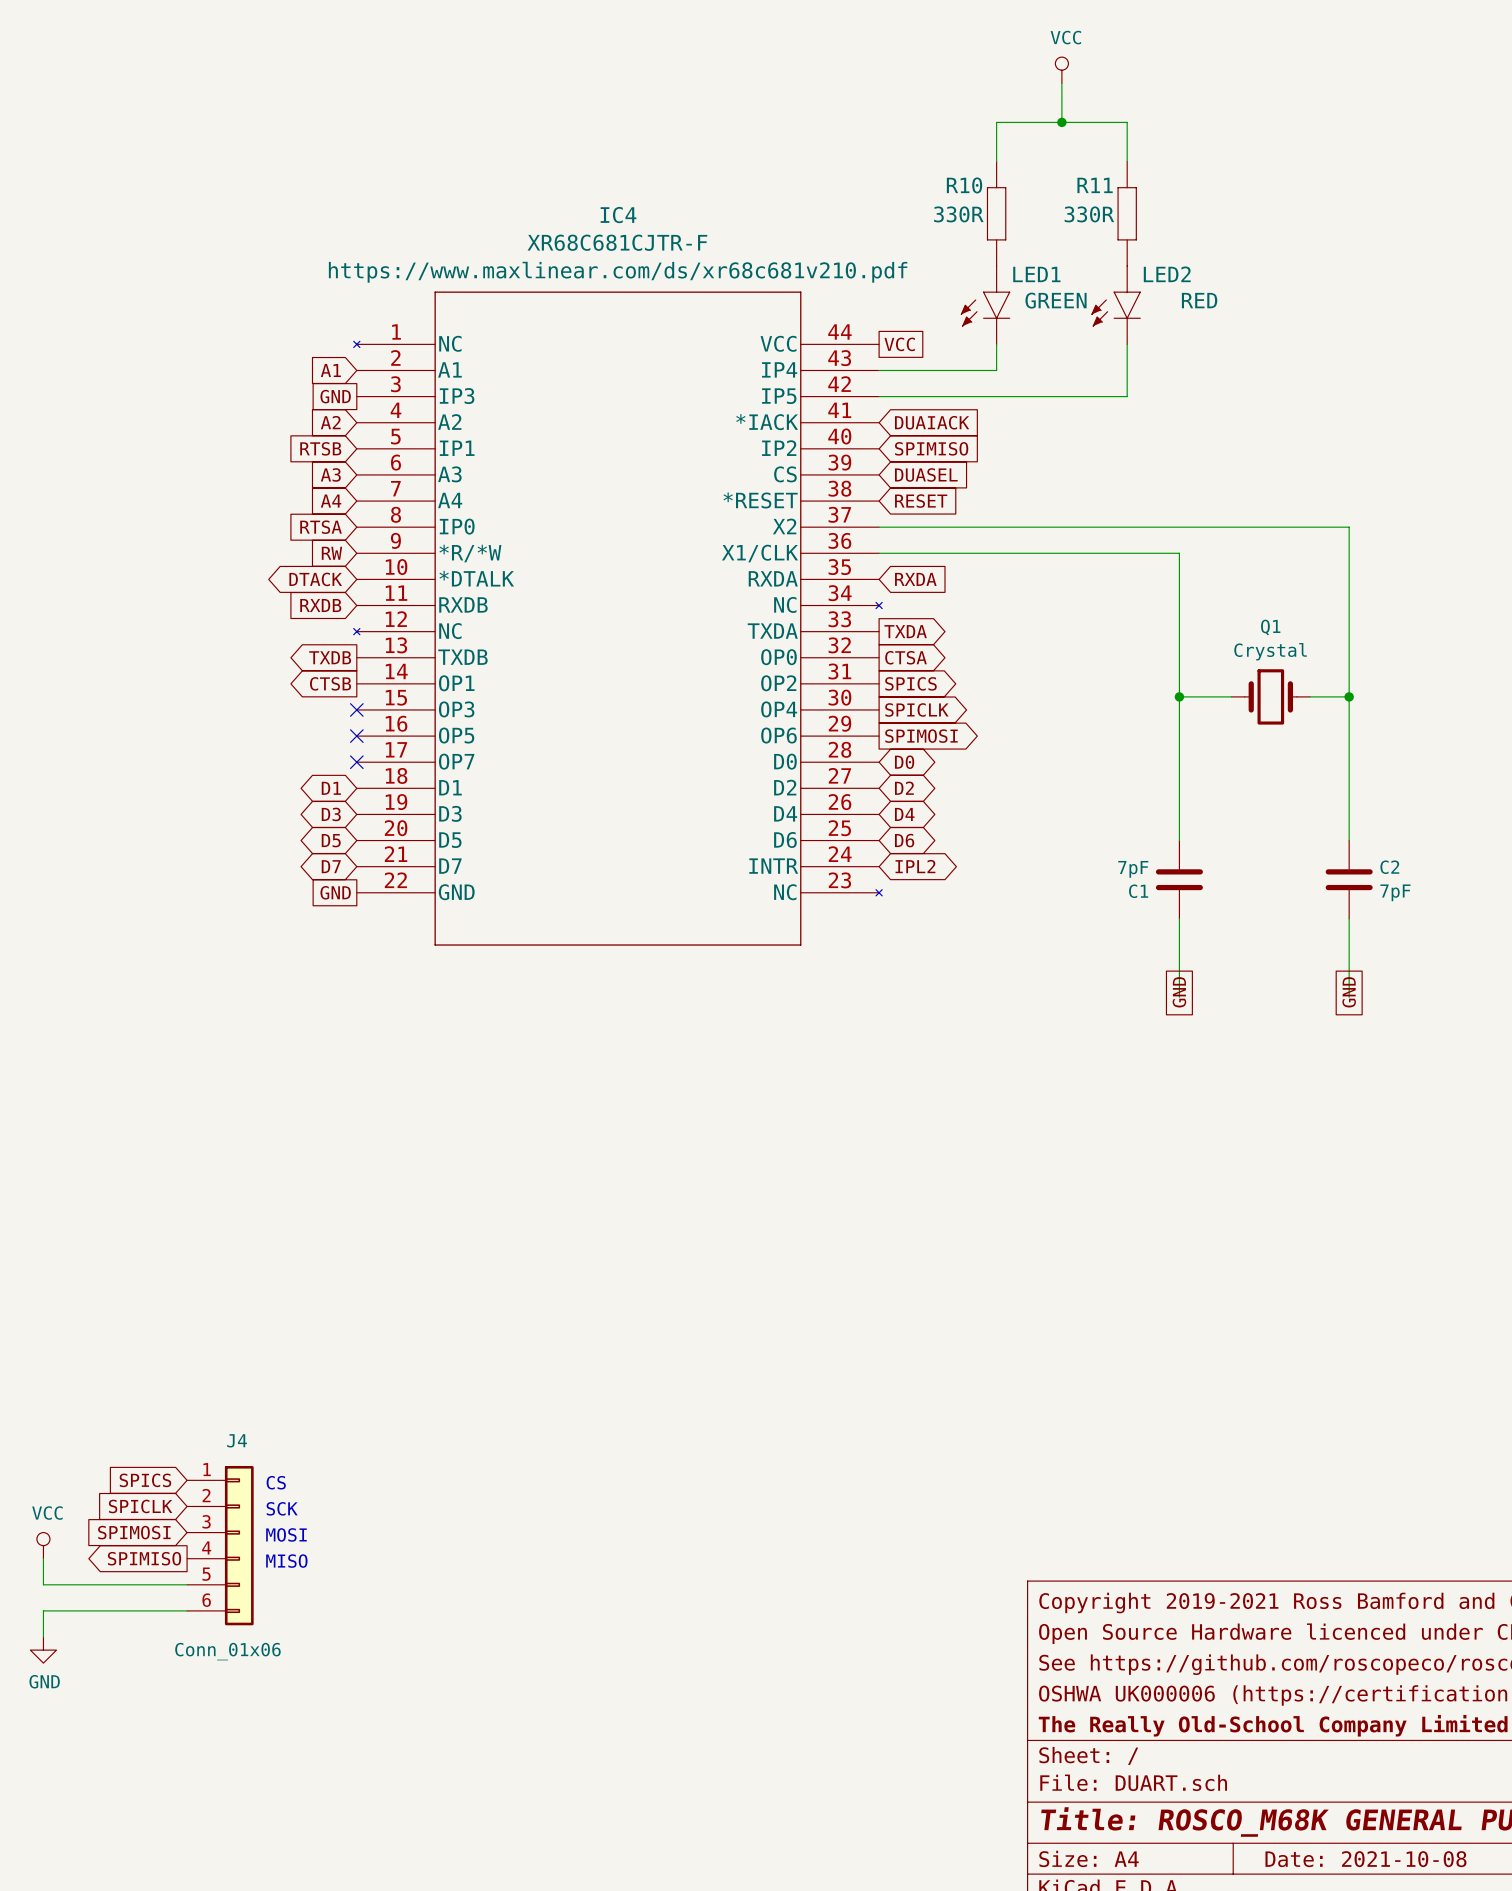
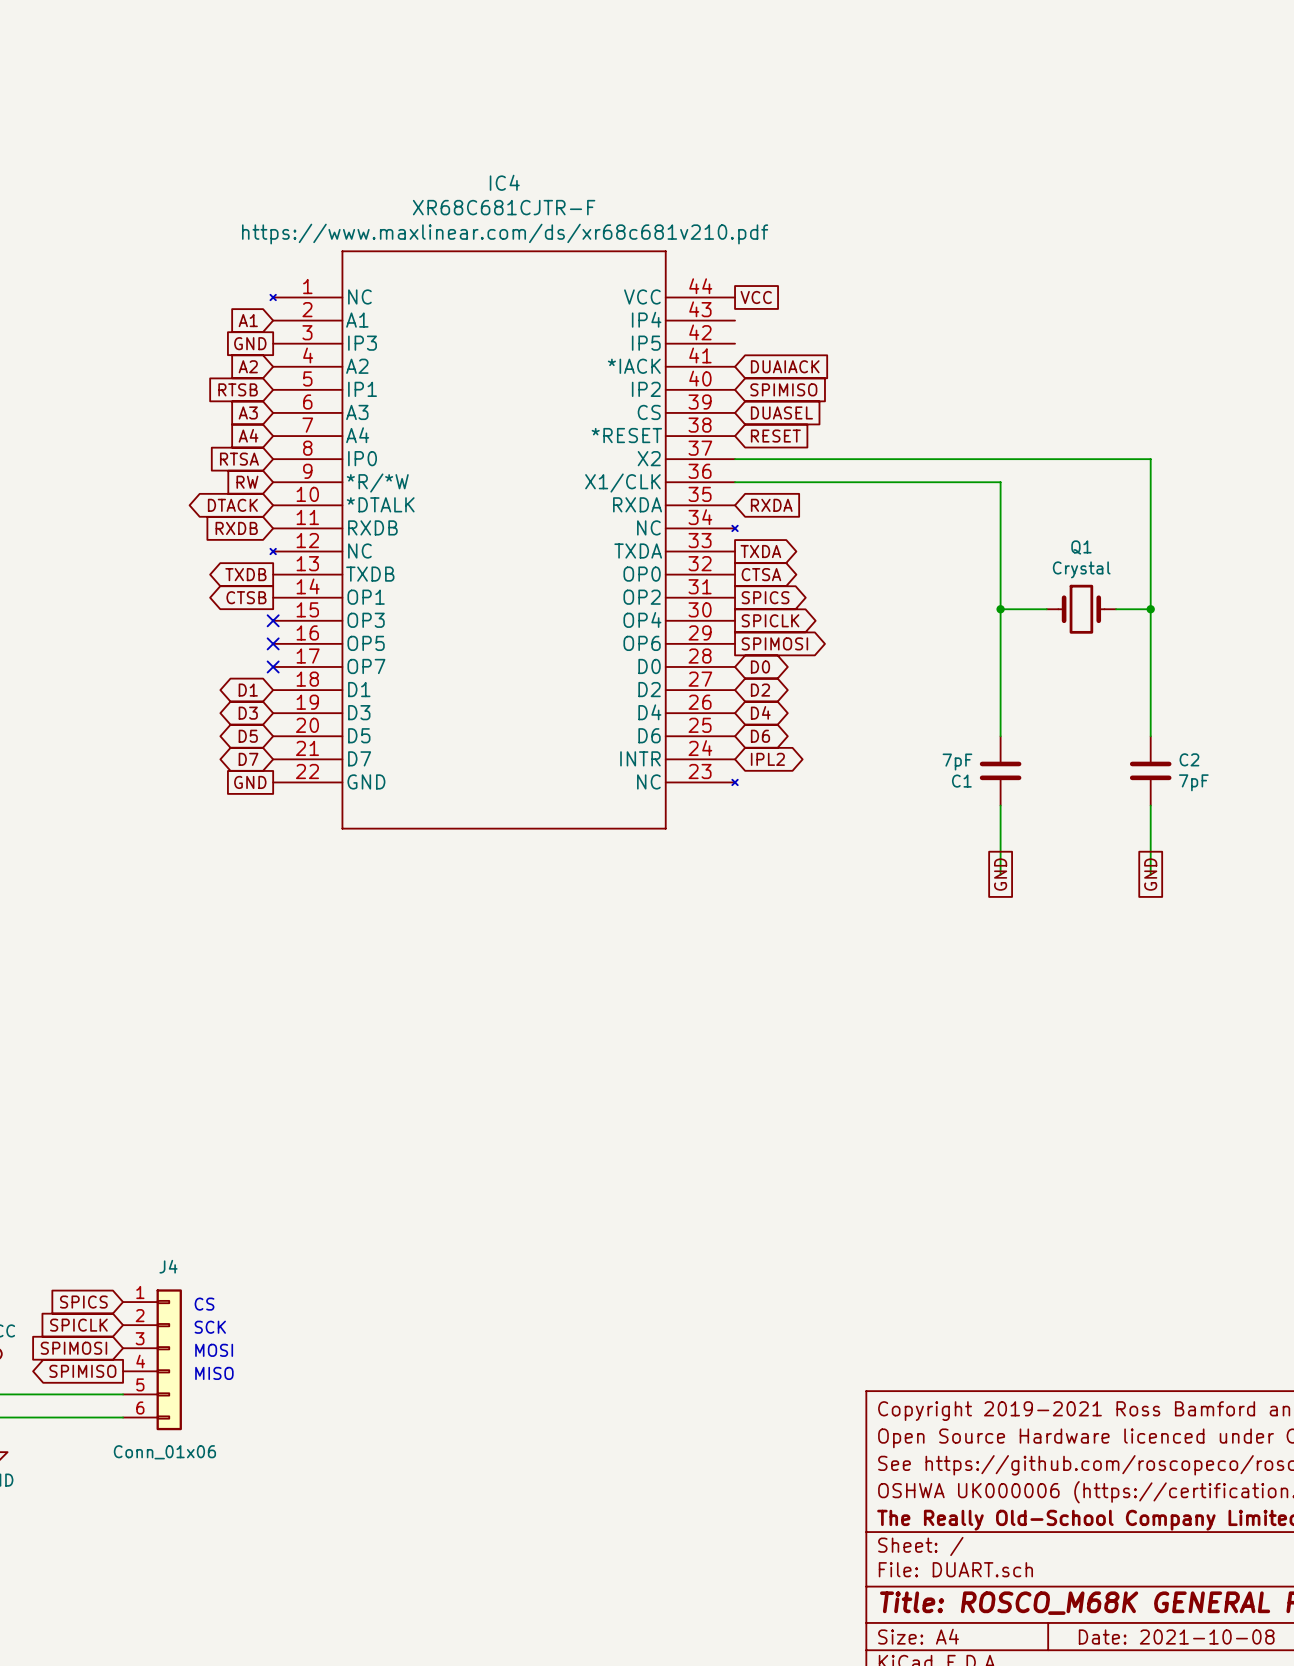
power symbol: VCC (1061, 70) -> none
wire: (1061, 83) (1061, 122) -> none
junction: (1061, 122) -> none
wire: (996, 161) (996, 122) (1127, 122) (1127, 161) -> none
R10: 330R (996, 213) -> none
R11: 330R (1127, 213) -> none
LED1: GREEN (985, 305) -> none
LED2: RED (1116, 305) -> none
wire: (996, 344) (996, 370) (879, 370) -> none
wire: (1127, 344) (1127, 396) (879, 396) -> none

